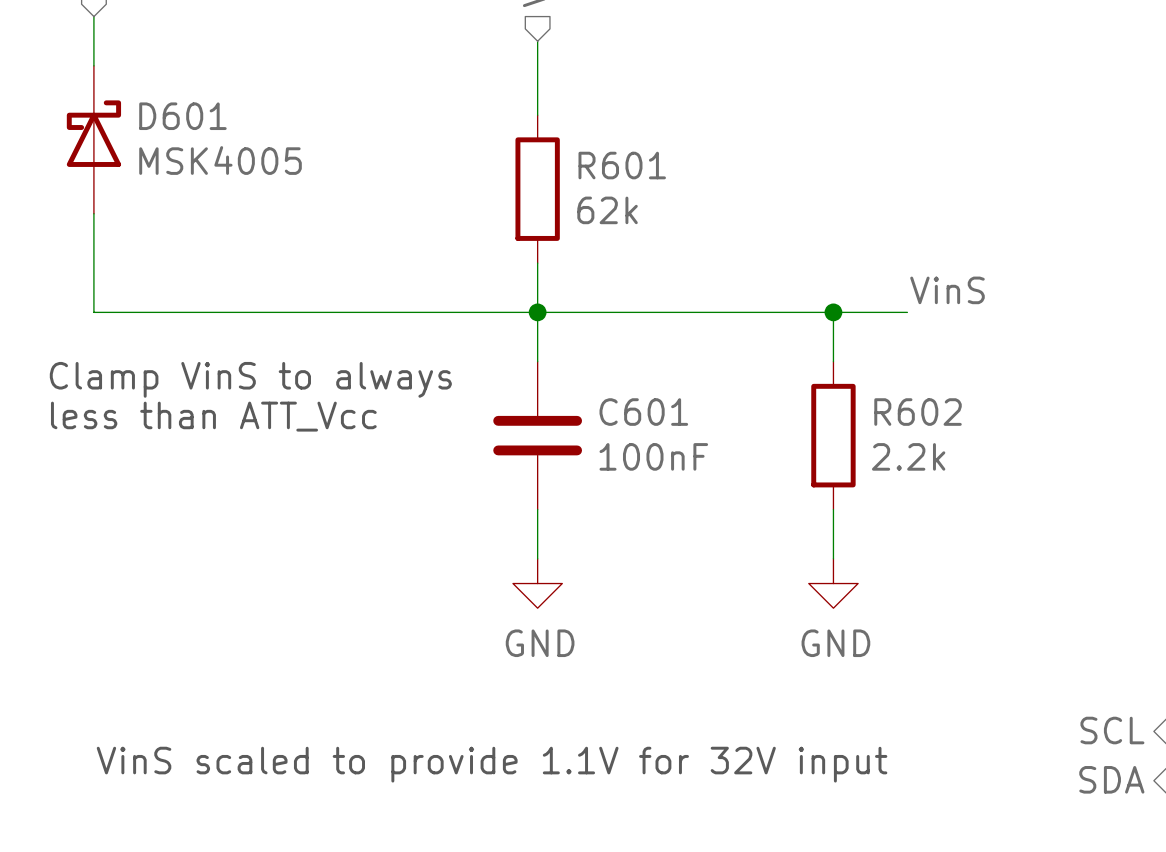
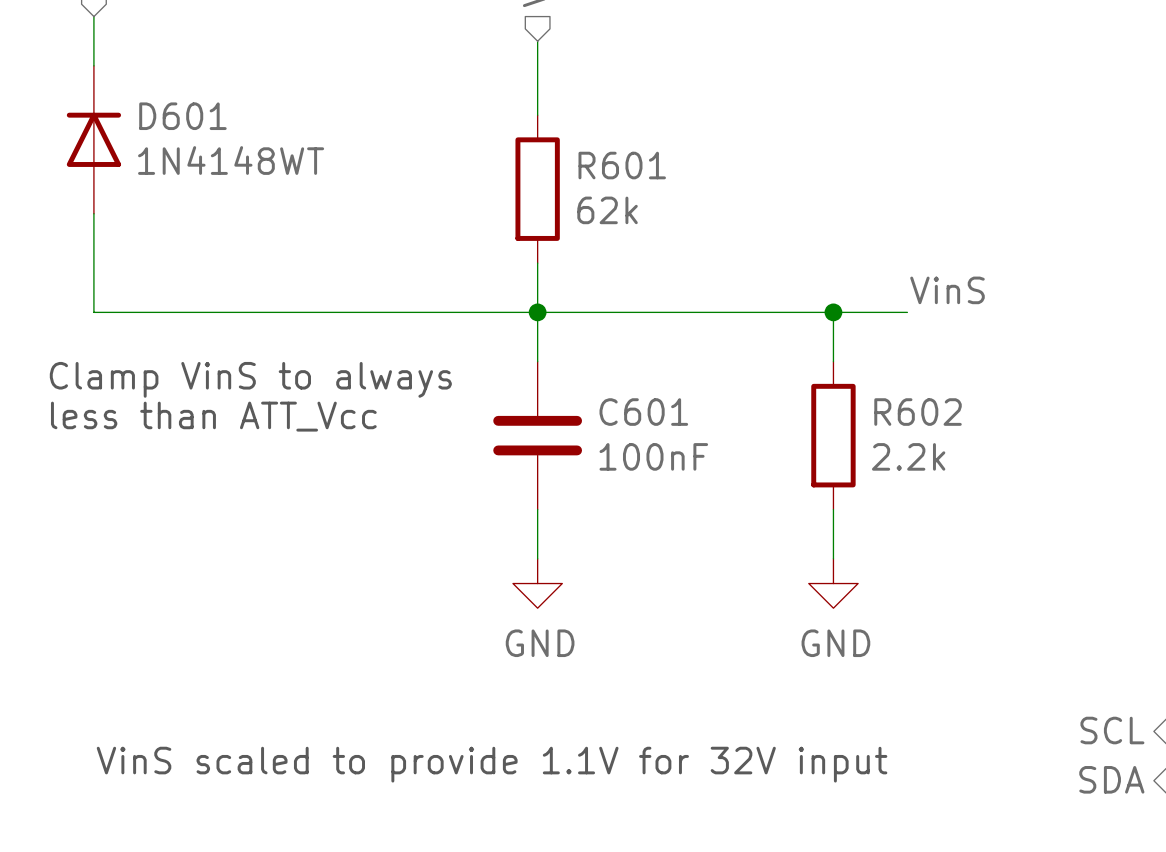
D601 symbol: [66, 65, 122, 214] -> [66, 65, 122, 214]
D601 value: MSK4005 (220, 160) -> 1N4148WT (231, 160)

